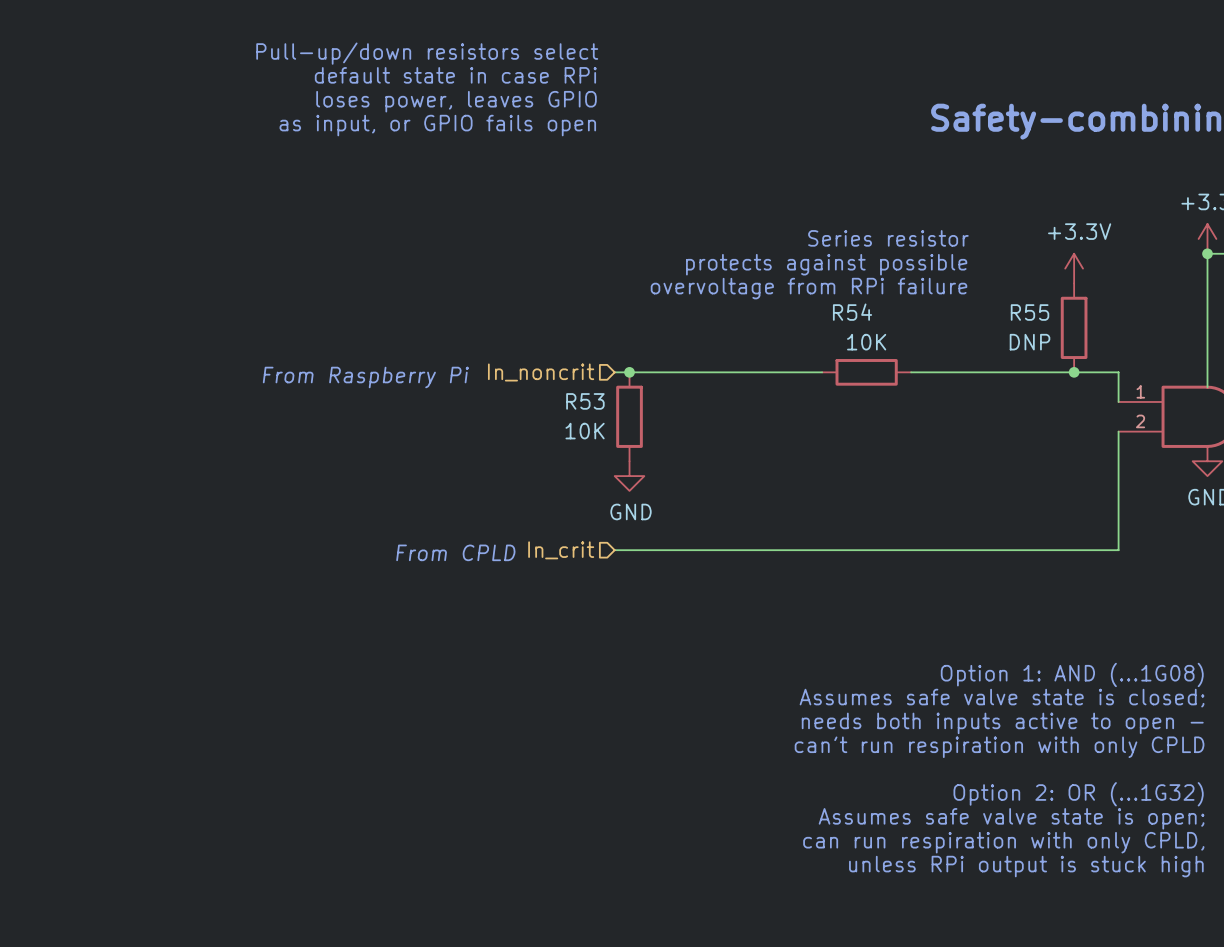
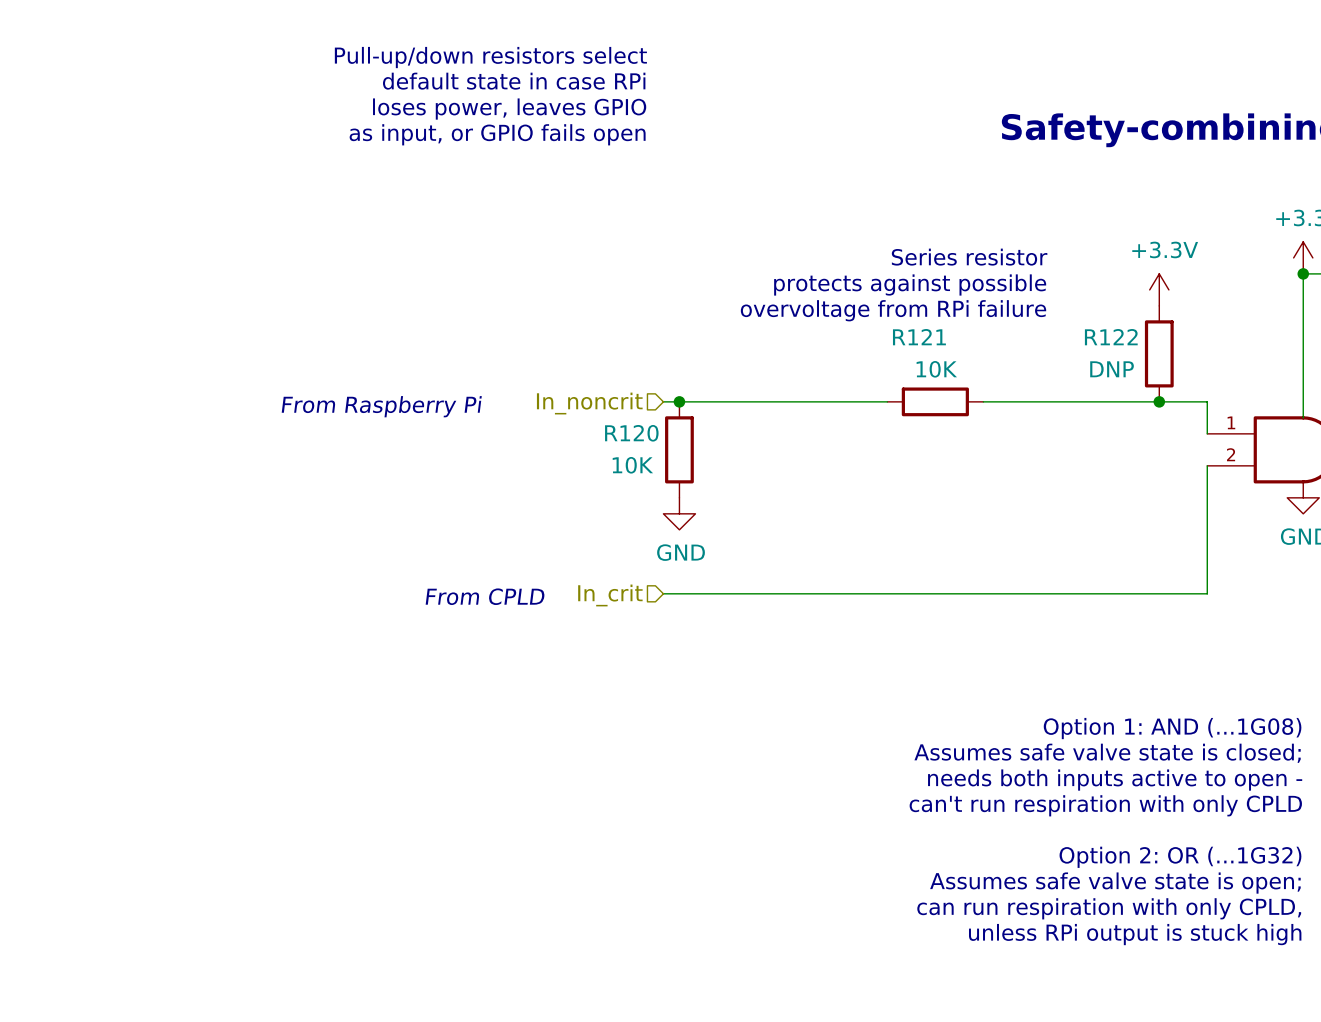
R54 name: R54 (852, 312) -> R121 (919, 337)
R55 name: R55 (1030, 312) -> R122 (1111, 337)
R53 name: R53 (585, 401) -> R120 (631, 433)

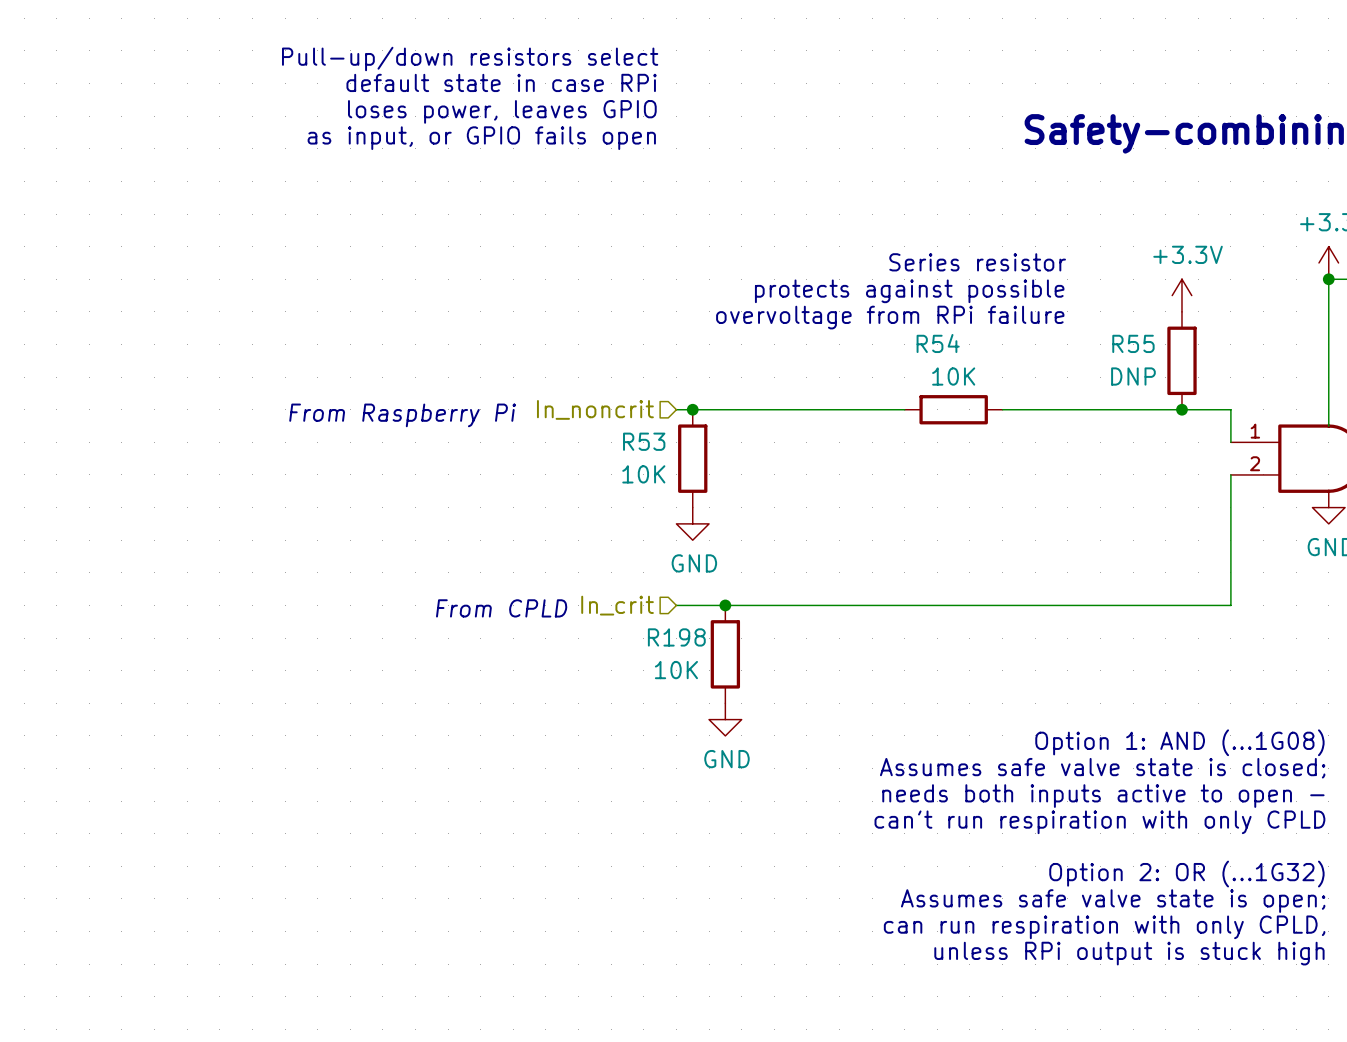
R121 name: R121 (919, 337) -> R54 (938, 343)
R122 name: R122 (1111, 337) -> R55 (1133, 343)
R120 name: R120 (631, 433) -> R53 (644, 441)
junction: none -> (725, 605)
R198: none -> 10K (725, 654)
power symbol: none -> GND (725, 719)

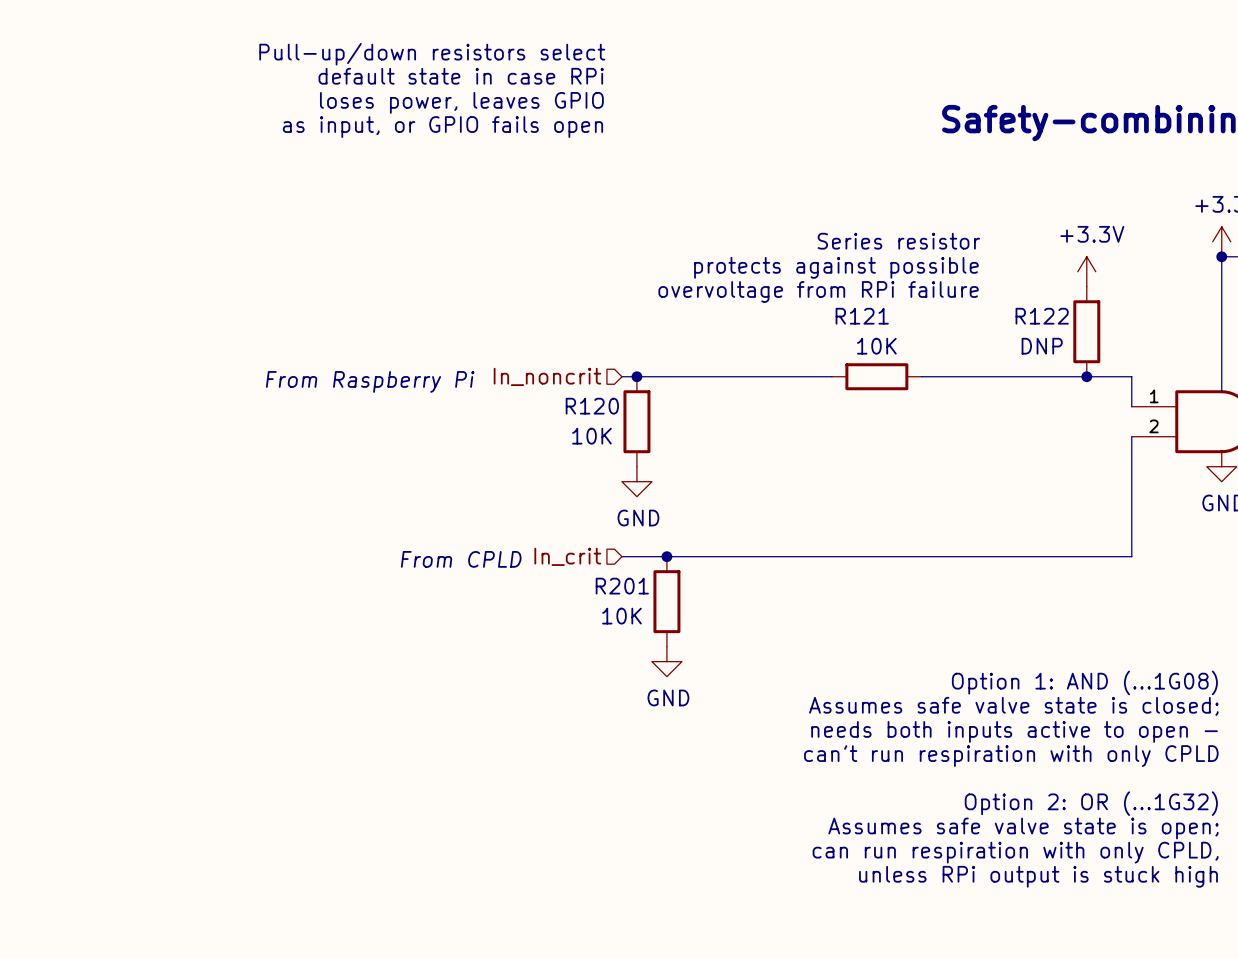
R54 name: R54 (938, 343) -> R121 (862, 316)
R55 name: R55 (1133, 343) -> R122 (1042, 316)
R53 name: R53 (644, 441) -> R120 (592, 406)
R198 name: R198 (676, 637) -> R201 (622, 586)

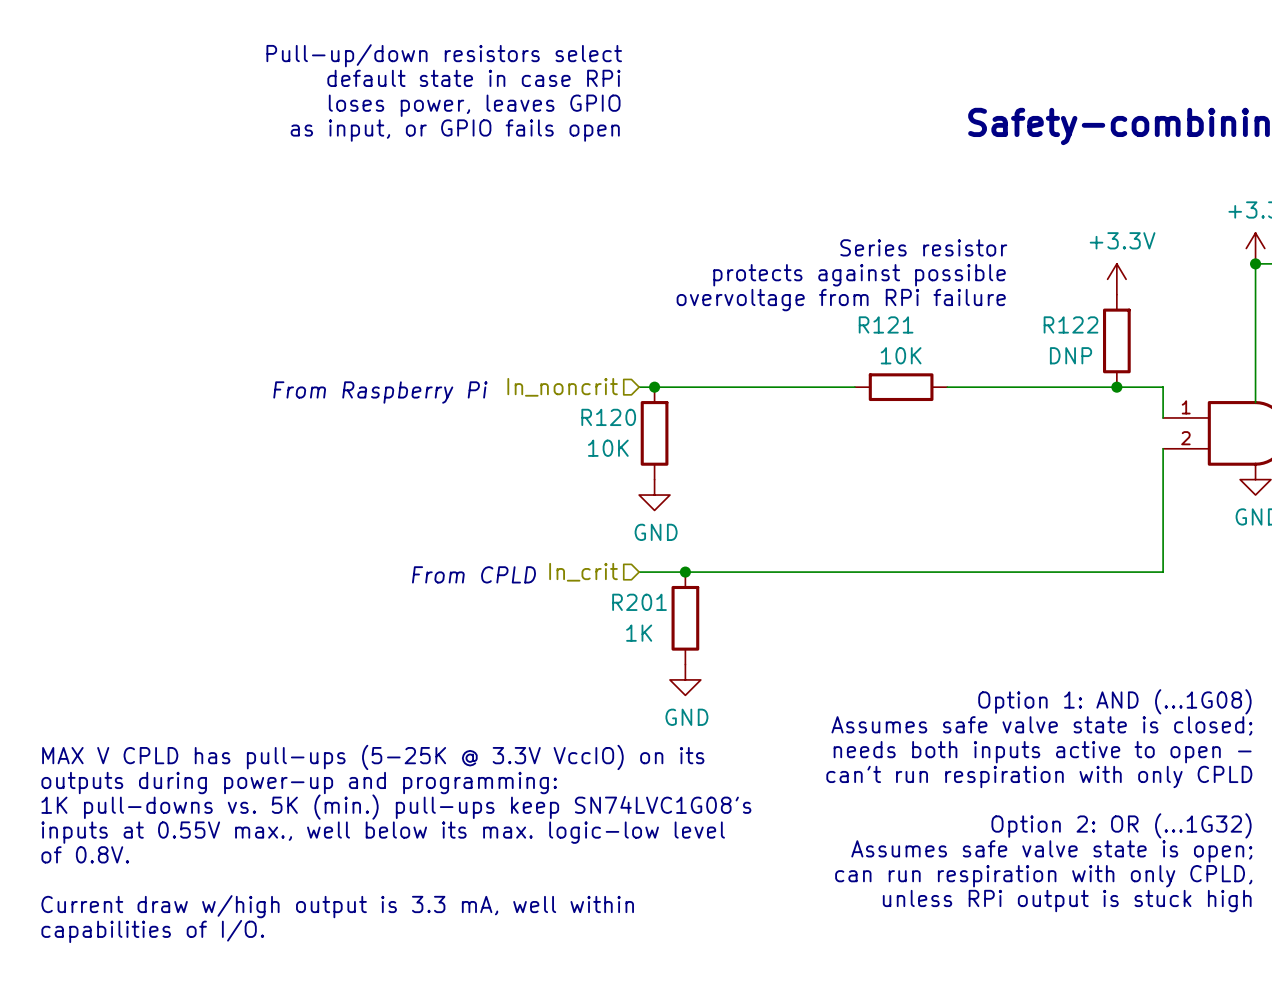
R201 value: 10K (621, 616) -> 1K (639, 633)
text: none -> MAX V CPLD has pull-ups (5-25K @ 3.3V VccIO) on its (373, 757)
text: none -> outputs during power-up and programming: (299, 783)
text: none -> 1K pull-downs vs. 5K (min.) pull-ups keep SN74LVC1G08's (396, 807)
text: none -> inputs at 0.55V max., well below its max. logic-low level (383, 832)
text: none -> of 0.8V. (85, 854)
text: none -> Current draw w/high output is 3.3 mA, well within (337, 906)
text: none -> capabilities of I/O. (152, 931)

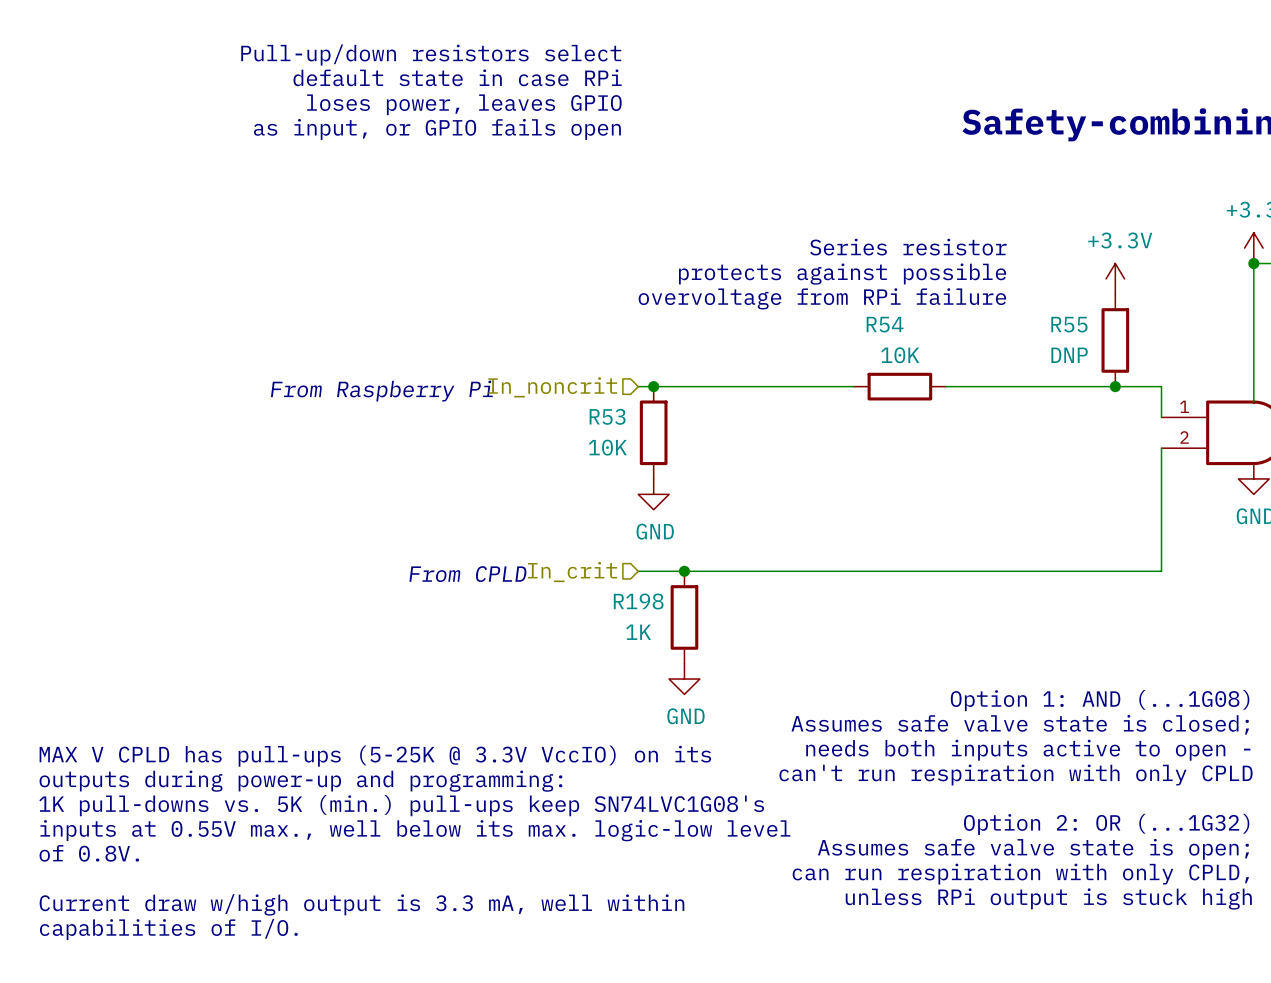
R121 name: R121 (886, 324) -> R54 (885, 324)
R122 name: R122 (1071, 324) -> R55 (1069, 324)
R120 name: R120 (608, 417) -> R53 (607, 416)
R201 name: R201 (639, 602) -> R198 (638, 601)

